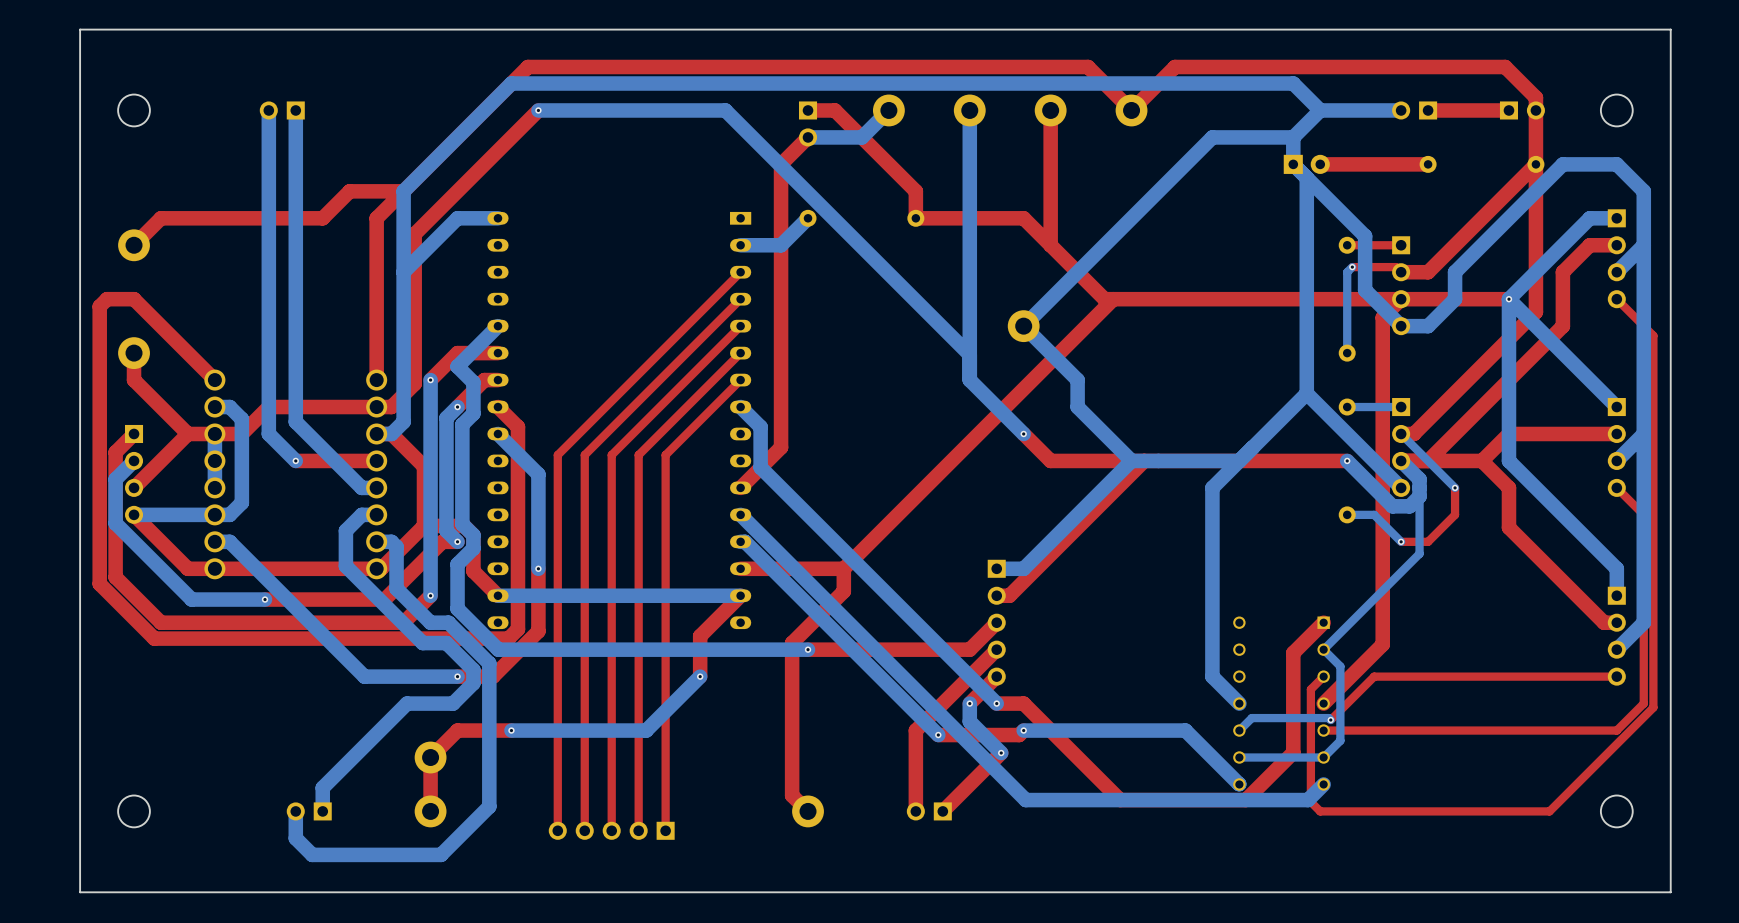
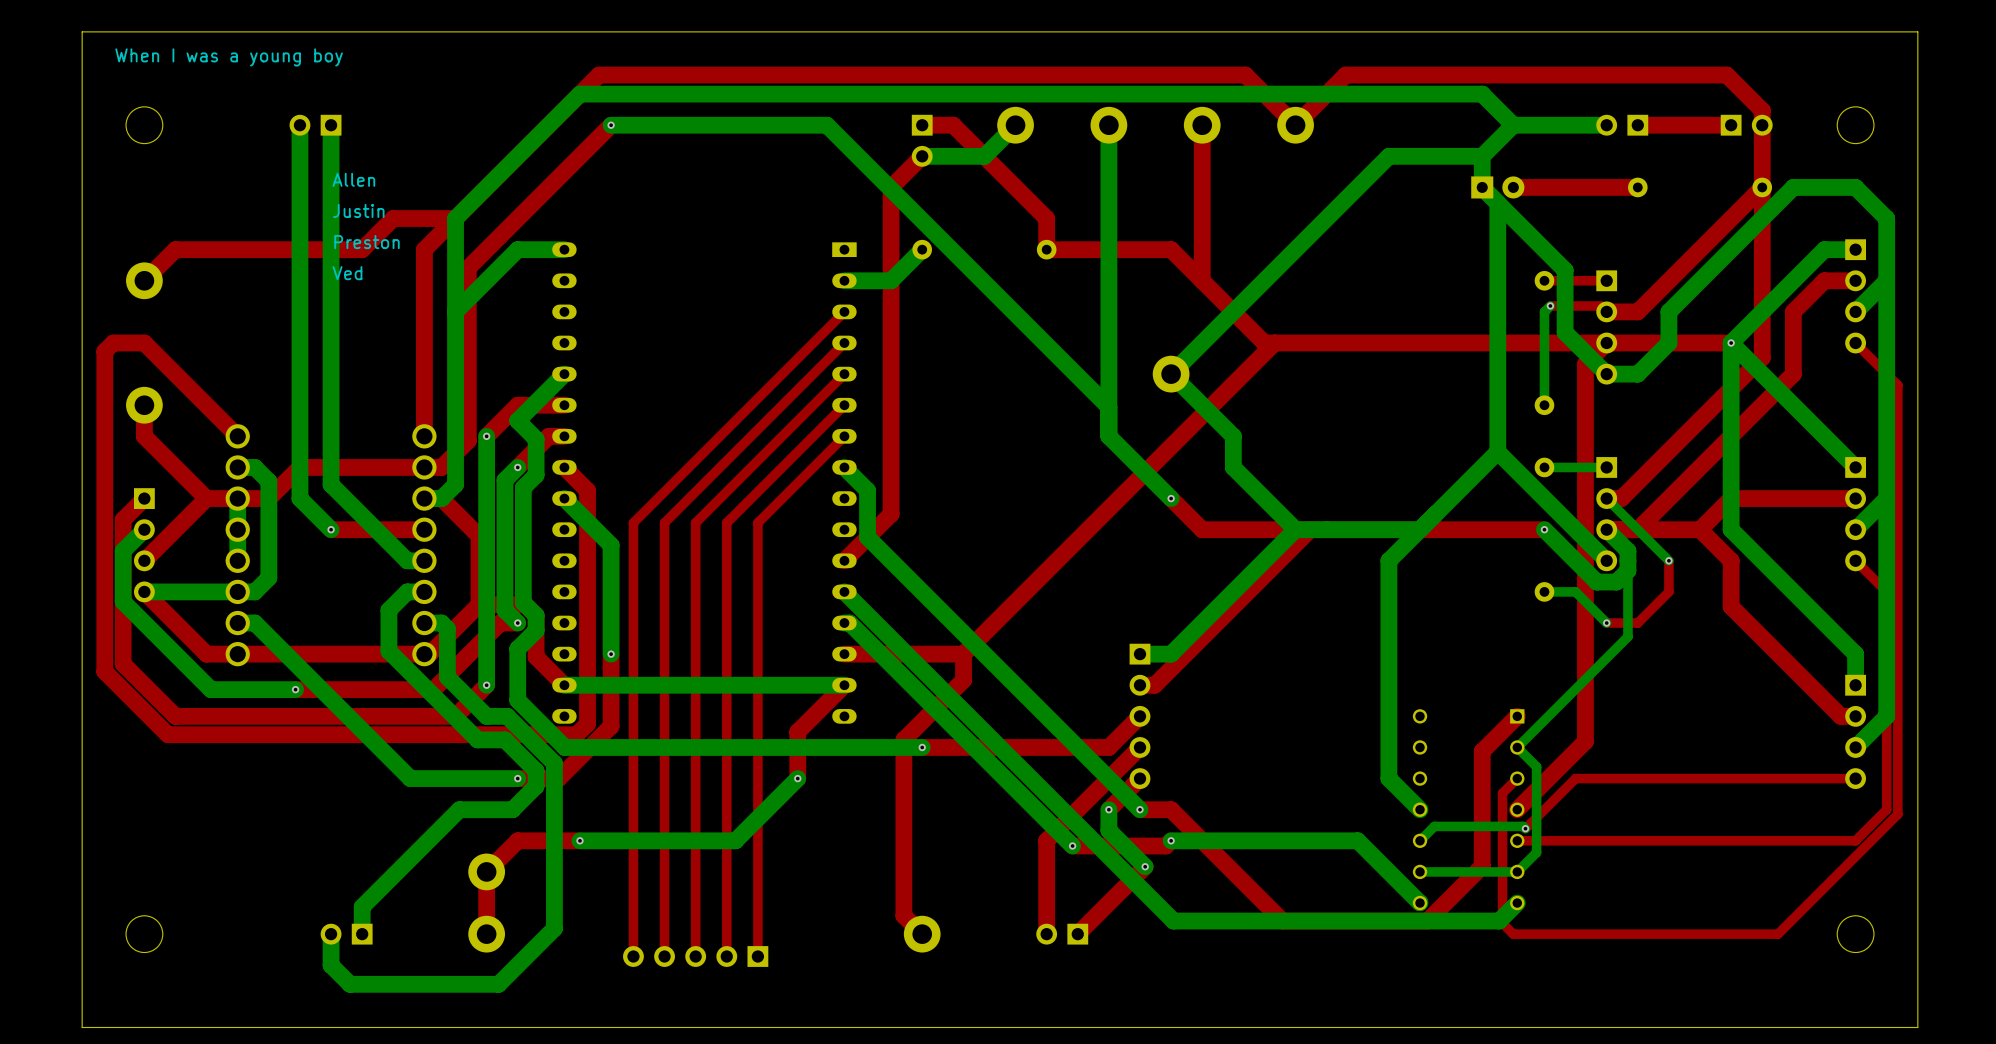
text: none -> When I was a young boy (229, 57)
text: none -> Allen (353, 179)
text: none -> Justin (358, 210)
text: none -> Preston (366, 242)
text: none -> Ved (347, 273)

